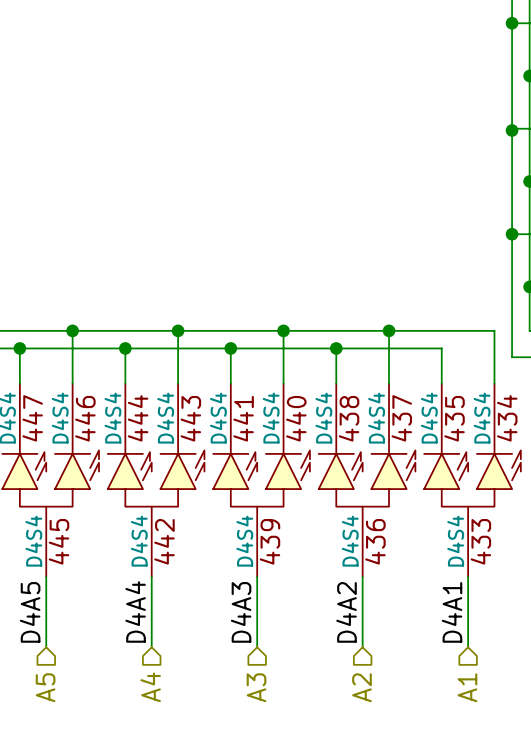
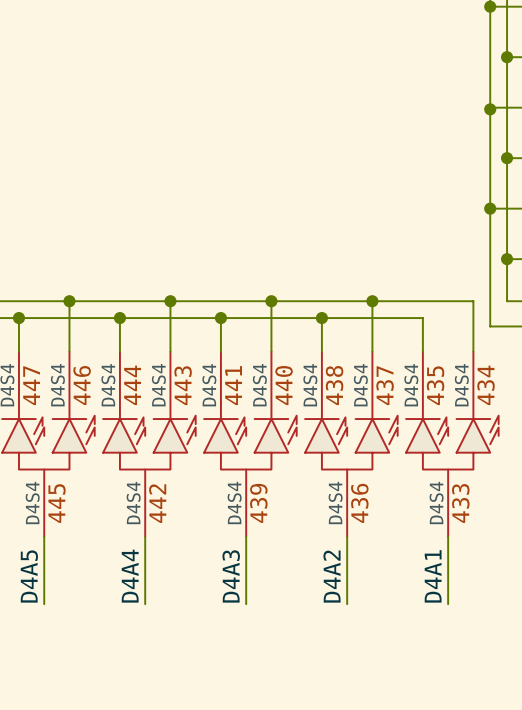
hierarchical label: A5 (45, 687) -> none
hierarchical label: A4 (150, 687) -> none
hierarchical label: A3 (256, 687) -> none
hierarchical label: A2 (361, 687) -> none
hierarchical label: A1 (467, 687) -> none

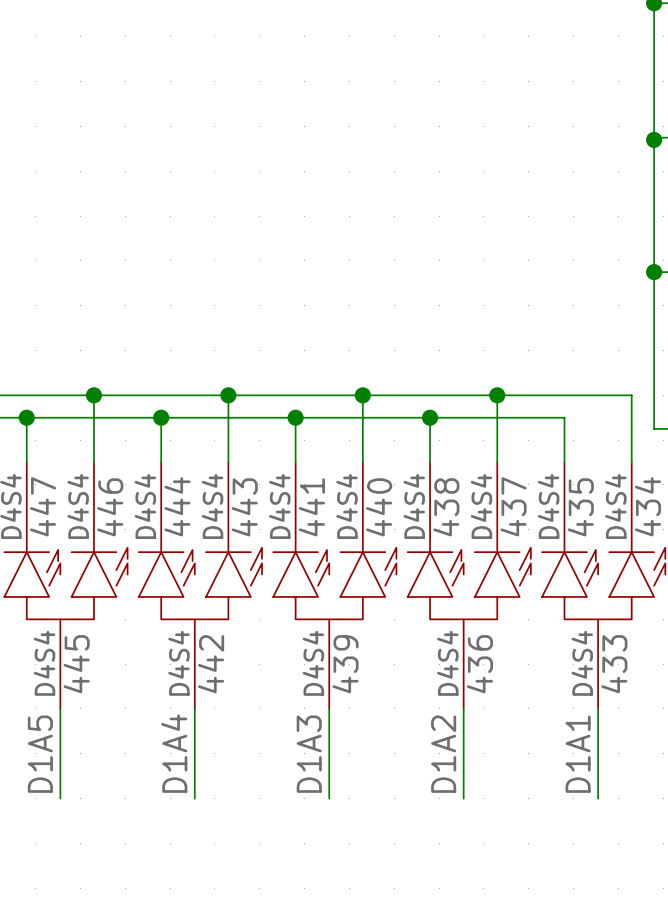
label: D4A5 (29, 576) -> D1A5 (40, 754)
label: D4A4 (130, 576) -> D1A4 (174, 753)
label: D4A3 (231, 576) -> D1A3 (309, 754)
label: D4A2 (331, 576) -> D1A2 (443, 754)
label: D4A1 (433, 576) -> D1A1 (578, 754)

